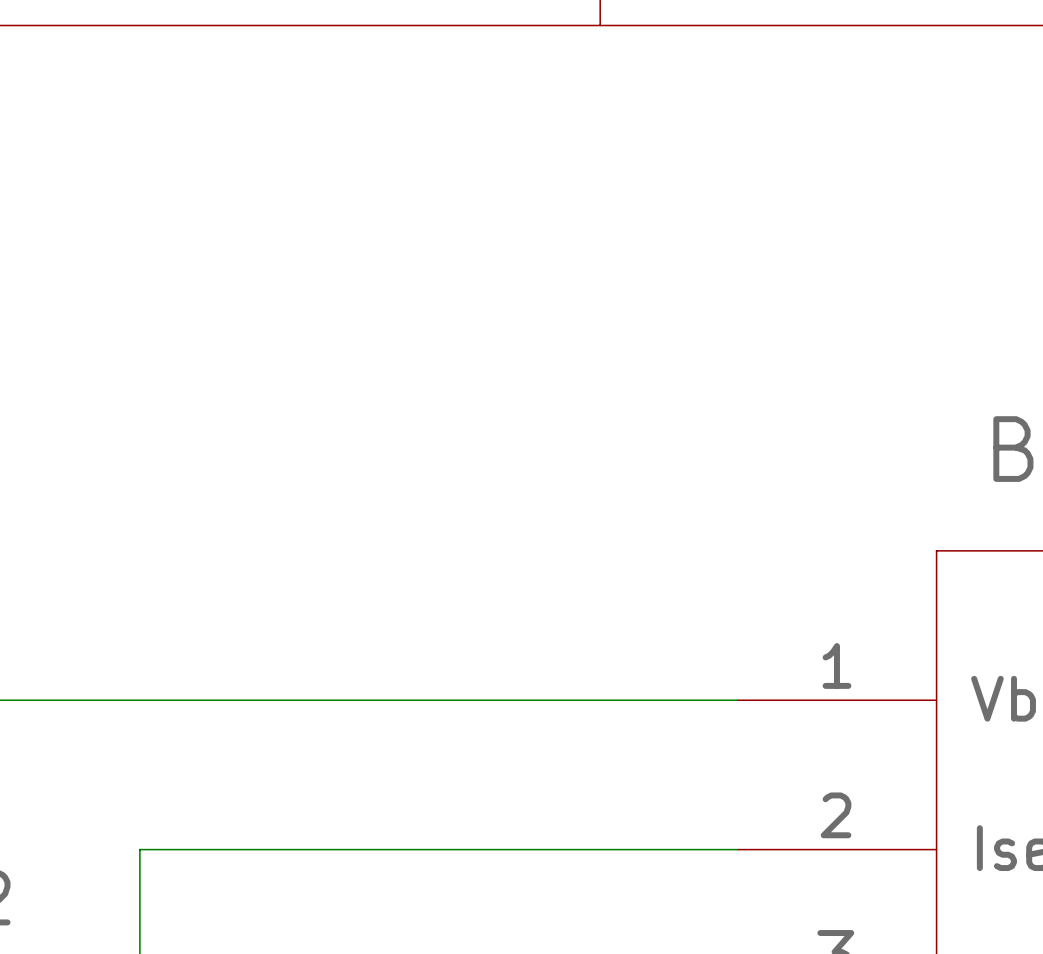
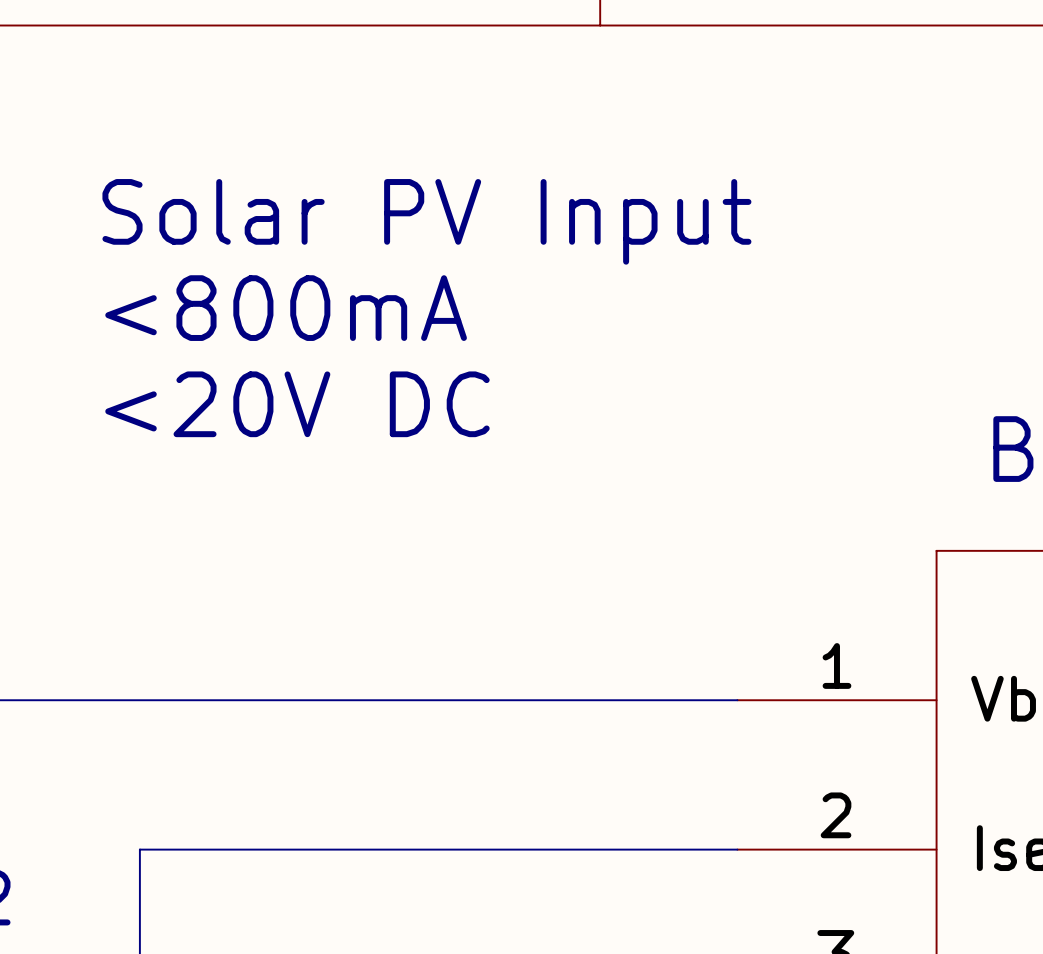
text: none -> Solar PV Input (426, 221)
text: none -> <800mA (286, 308)
text: none -> <20V DC (297, 404)

